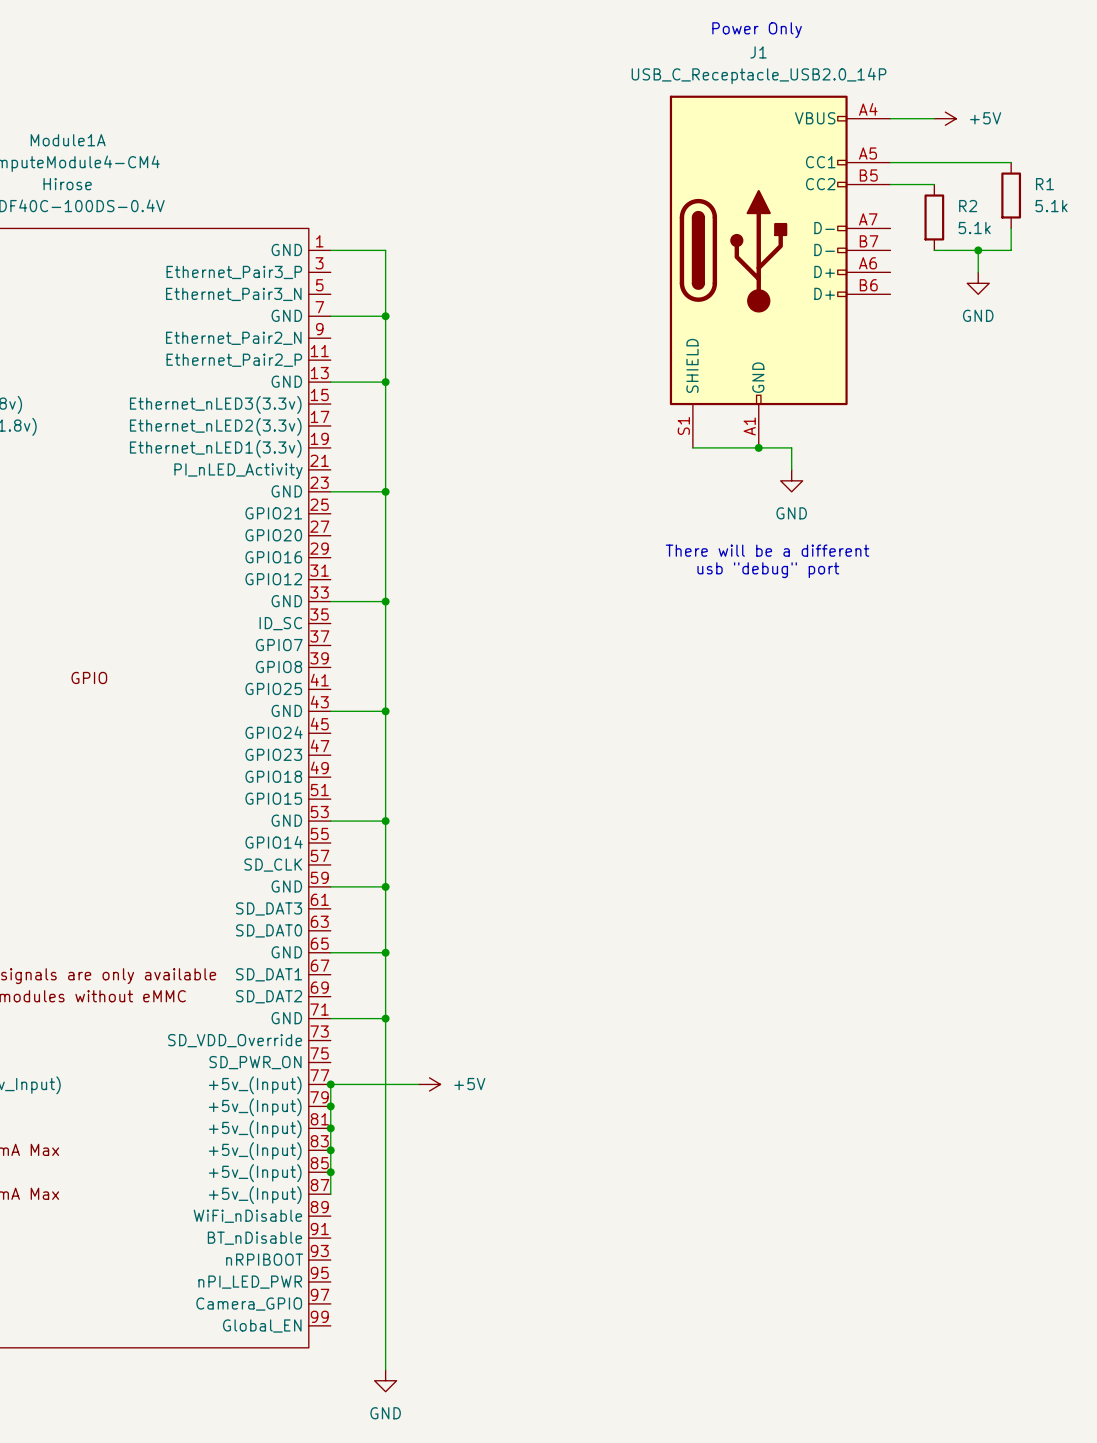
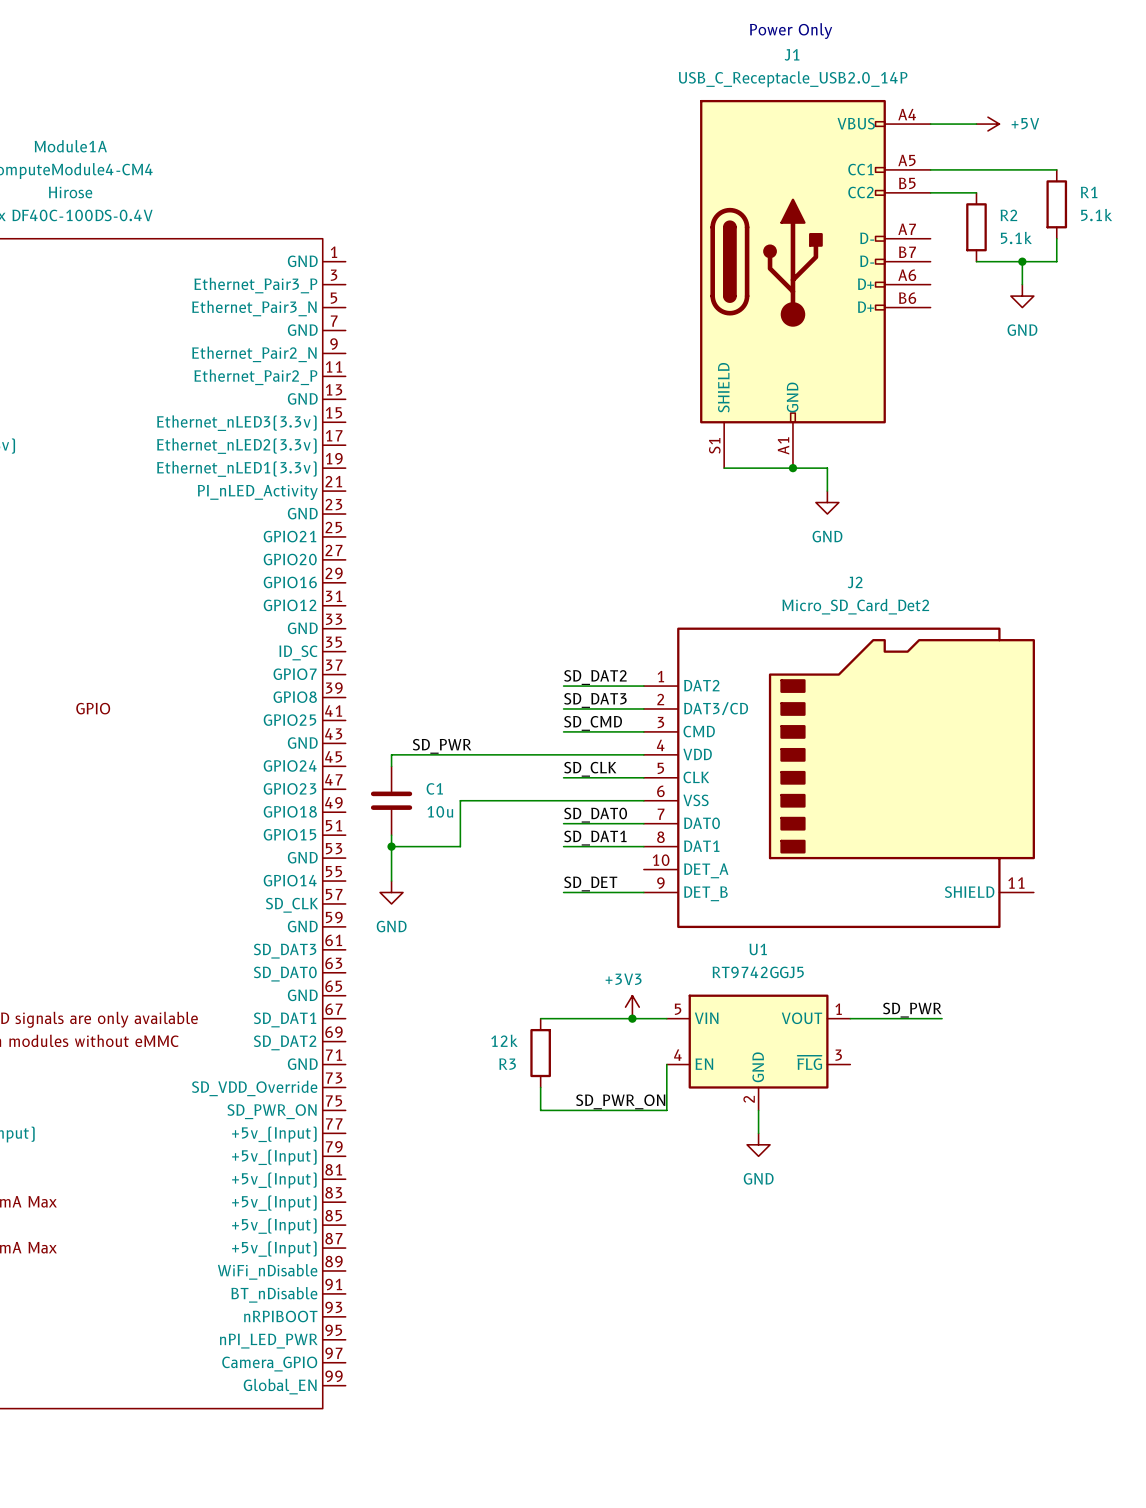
wire: (330, 250) (385, 250) (385, 1369) -> none
wire: (330, 316) (385, 316) -> none
junction: (385, 316) -> none
wire: (330, 382) (385, 382) -> none
junction: (385, 382) -> none
wire: (330, 491) (385, 491) -> none
junction: (385, 491) -> none
text: There will be a different (767, 550) -> none
text: usb "debug" port (768, 570) -> none
wire: (330, 601) (385, 601) -> none
junction: (385, 601) -> none
label: none -> SD_DAT2 (595, 677)
wire: none -> (563, 686) (643, 686)
label: none -> SD_DAT3 (595, 700)
wire: none -> (563, 708) (643, 708)
label: none -> SD_CMD (593, 723)
wire: none -> (563, 731) (643, 731)
wire: (330, 711) (385, 711) -> none
junction: (385, 711) -> none
label: none -> SD_PWR (442, 746)
wire: none -> (643, 754) (391, 754) (391, 766)
label: none -> SD_CLK (590, 769)
wire: none -> (563, 777) (643, 777)
J2: none -> Micro_SD_Card_Det2 (839, 777)
C1: none -> 10u (391, 800)
wire: none -> (643, 800) (460, 800) (460, 846) (391, 846)
label: none -> SD_DAT0 (595, 815)
wire: none -> (563, 823) (643, 823)
wire: none -> (391, 835) (391, 881)
label: none -> SD_DAT1 (595, 838)
wire: none -> (563, 846) (643, 846)
wire: (330, 821) (385, 821) -> none
junction position: (385, 821) -> (391, 846)
label: none -> SD_DET (590, 883)
power symbol: none -> GND (391, 892)
wire: none -> (563, 892) (643, 892)
wire: (330, 886) (385, 886) -> none
junction: (385, 886) -> none
wire: (330, 952) (385, 952) -> none
junction: (385, 952) -> none
power symbol: none -> +3V3 (632, 1007)
label: none -> SD_PWR (912, 1010)
wire: none -> (540, 1018) (666, 1018)
junction: none -> (632, 1018)
wire: none -> (850, 1018) (942, 1018)
R3: none -> 12k (540, 1053)
U1: none -> RT9742GGJ5 (758, 1052)
wire: (330, 1018) (385, 1018) -> none
junction: (385, 1018) -> none
wire: none -> (666, 1064) (666, 1110) (540, 1110) (540, 1087)
label: none -> SD_PWR_ON (620, 1101)
wire: none -> (758, 1110) (758, 1133)
junction: (330, 1084) -> none
wire: (418, 1084) (330, 1084) (330, 1194) -> none
power symbol: +5V (429, 1084) -> none
power symbol: none -> GND (758, 1144)
junction: (330, 1106) -> none
junction: (330, 1128) -> none
junction: (330, 1150) -> none
junction: (330, 1172) -> none
power symbol: GND (385, 1380) -> none

